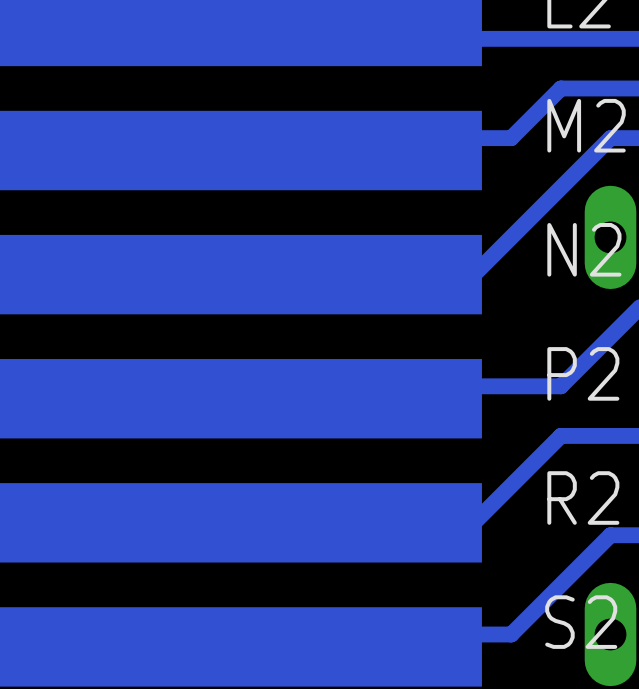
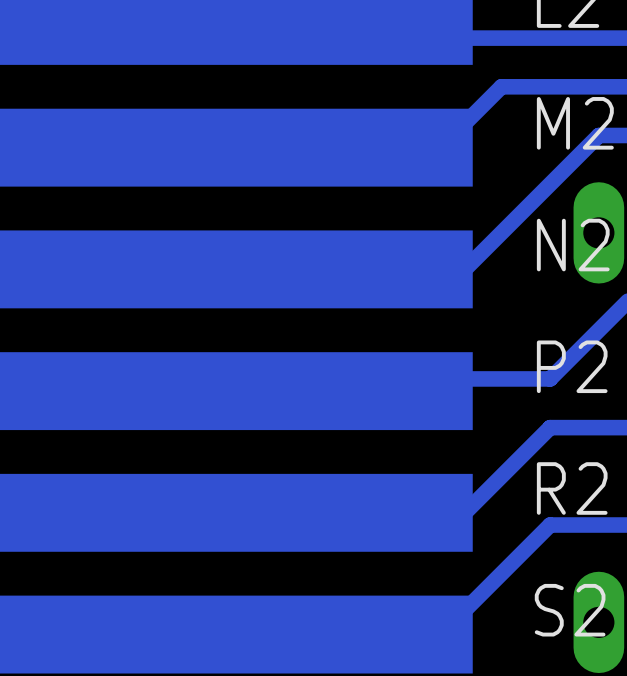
track: (560, 88) (511, 138) (461, 138) -> (550, 86) (501, 86) (452, 135)
track: (610, 535) (511, 634) (461, 634) -> (598, 525) (550, 525) (452, 622)

